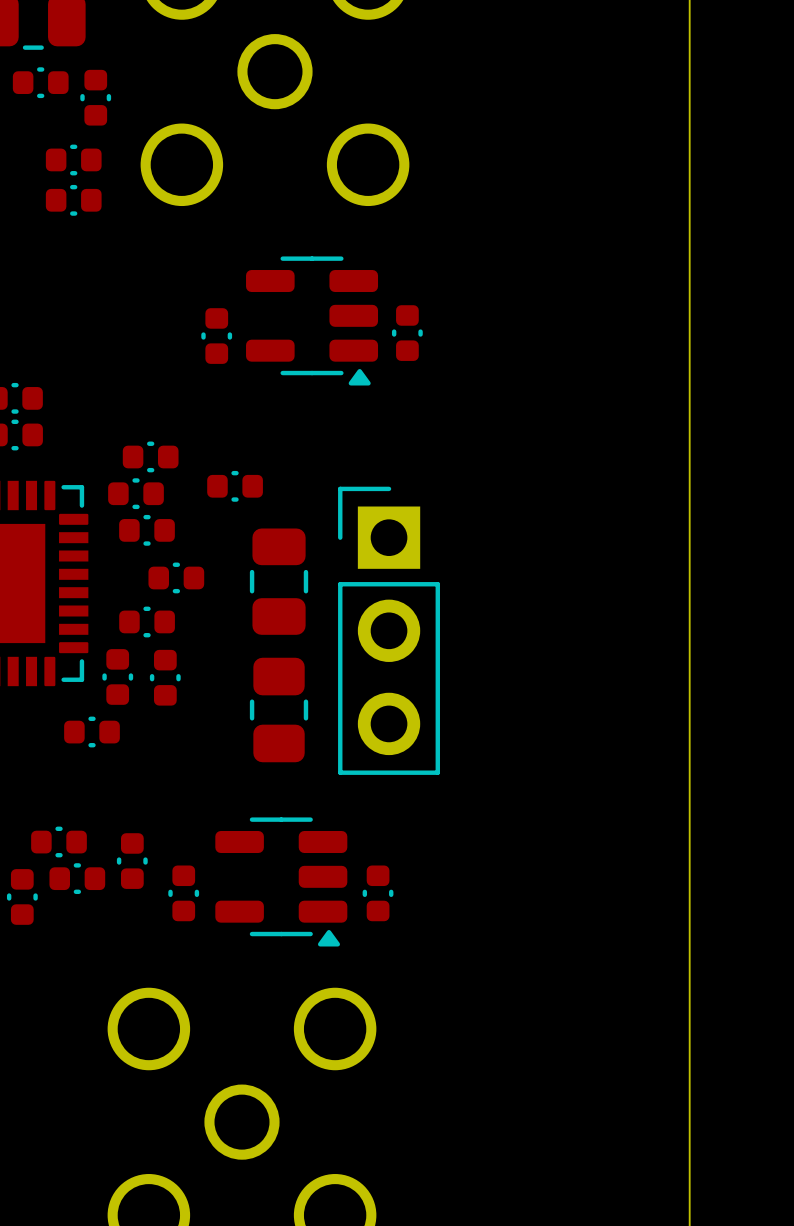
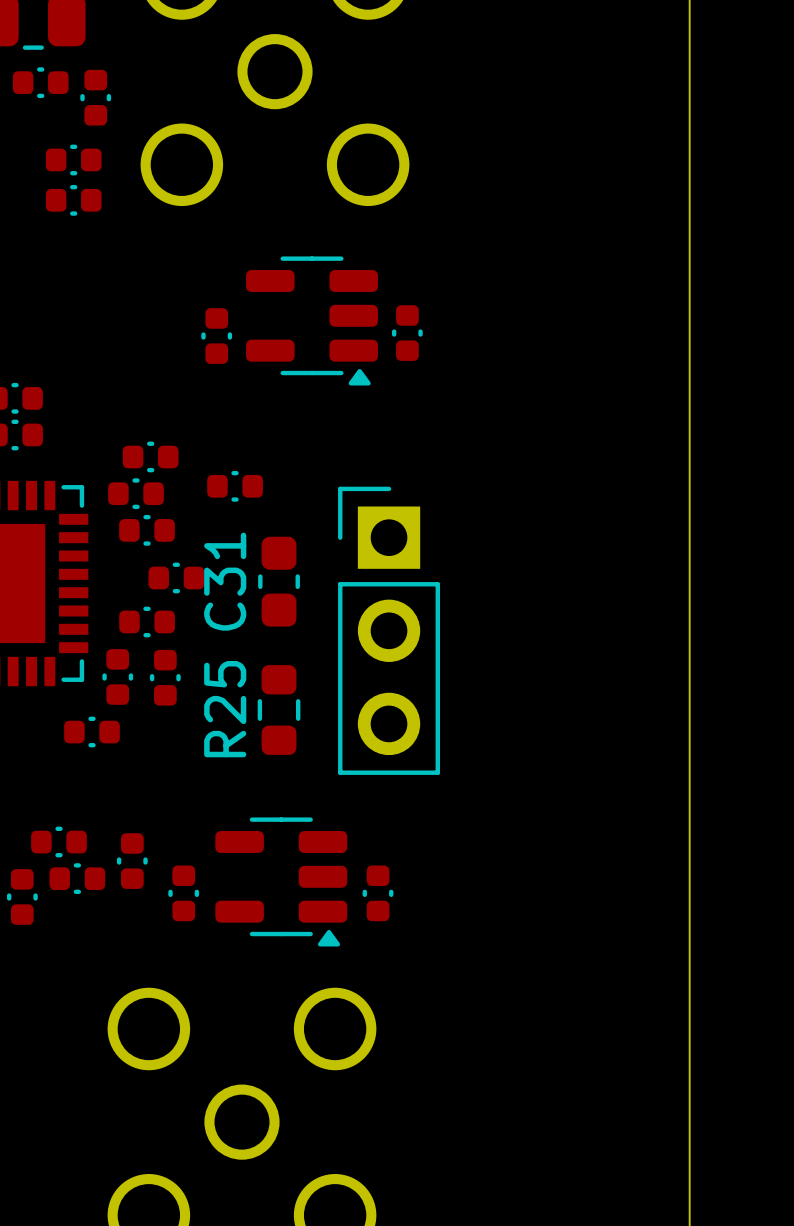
part: (279, 581) -> none
C31: none -> (279, 581)
part: (279, 710) -> none
R25: none -> (279, 710)

